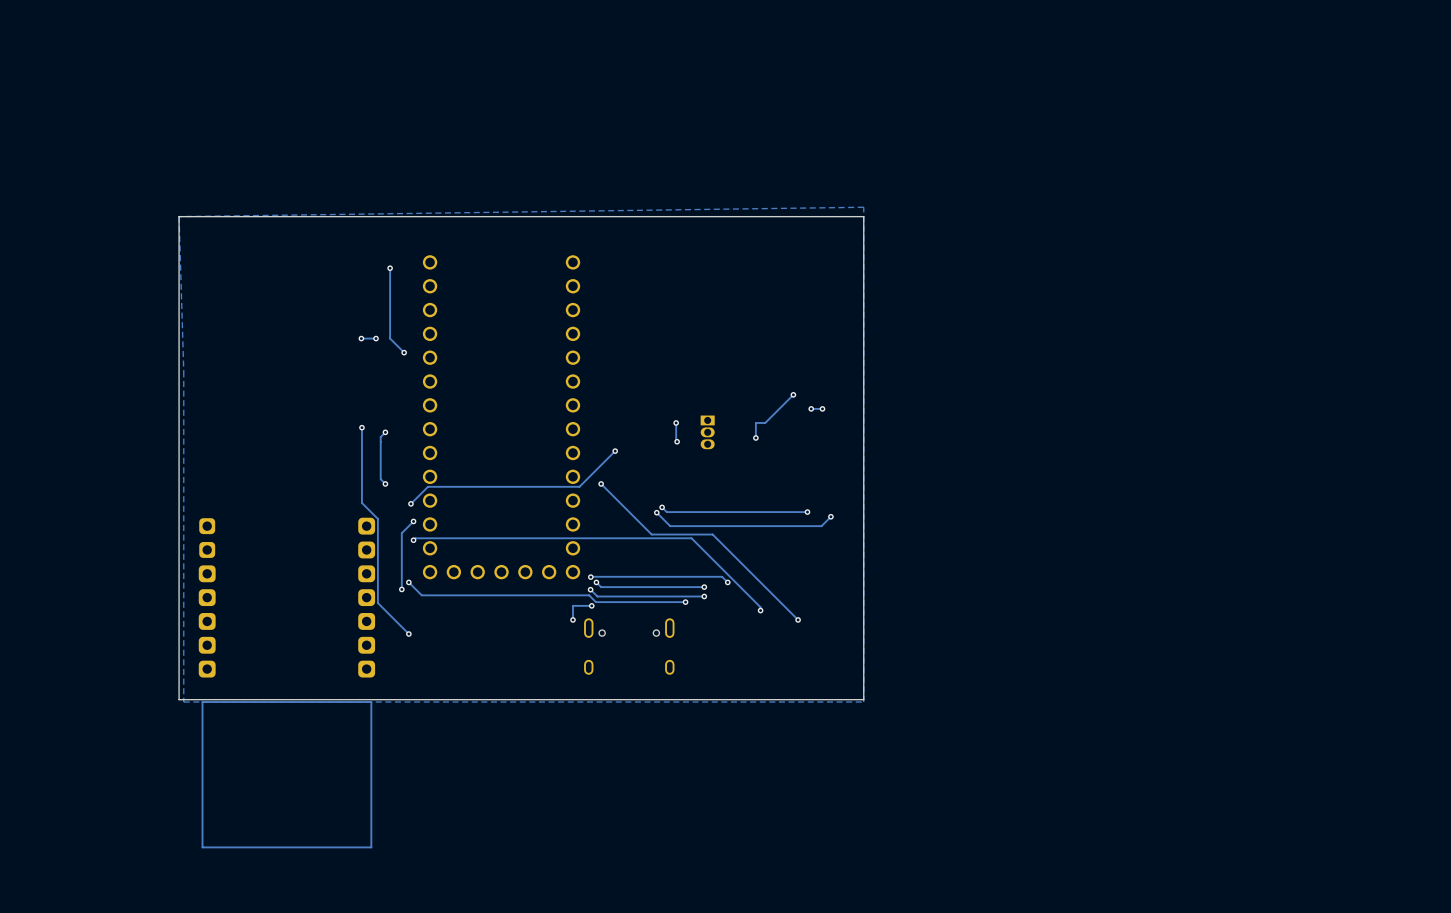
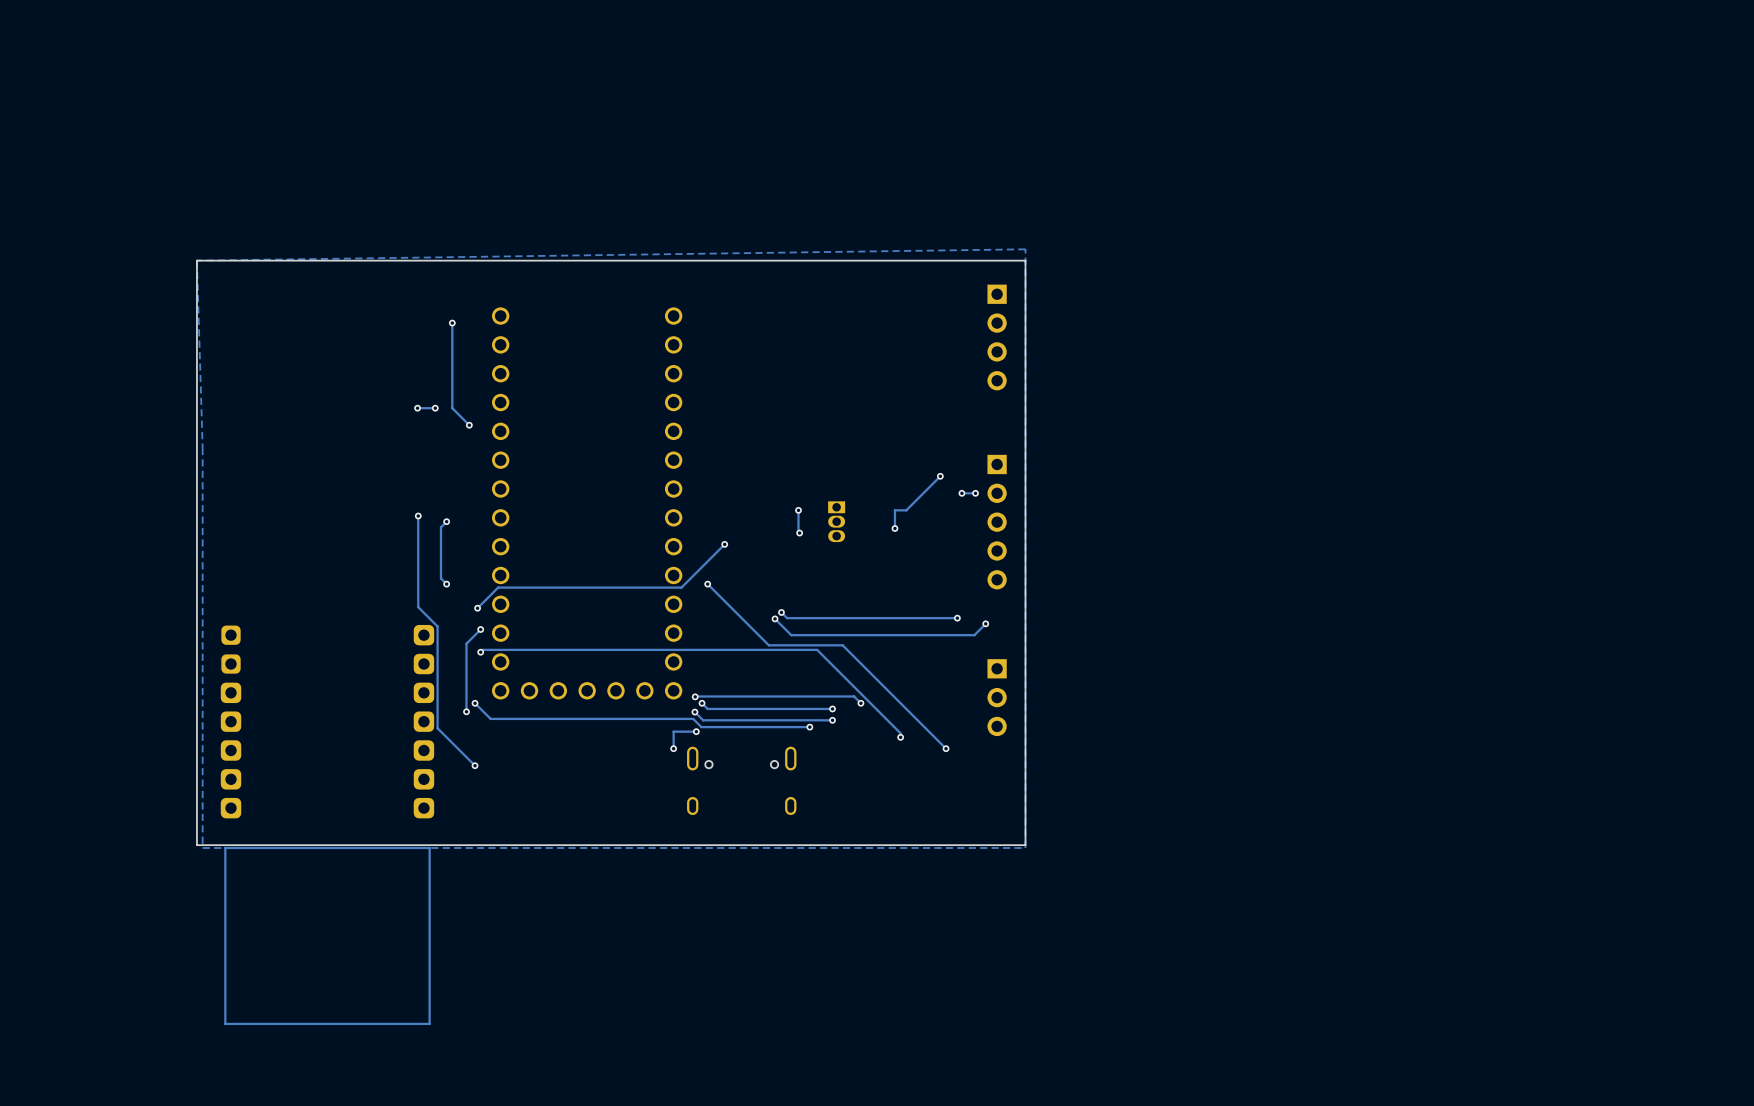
part: none -> (997, 337)
part: none -> (997, 522)
part: none -> (997, 697)

